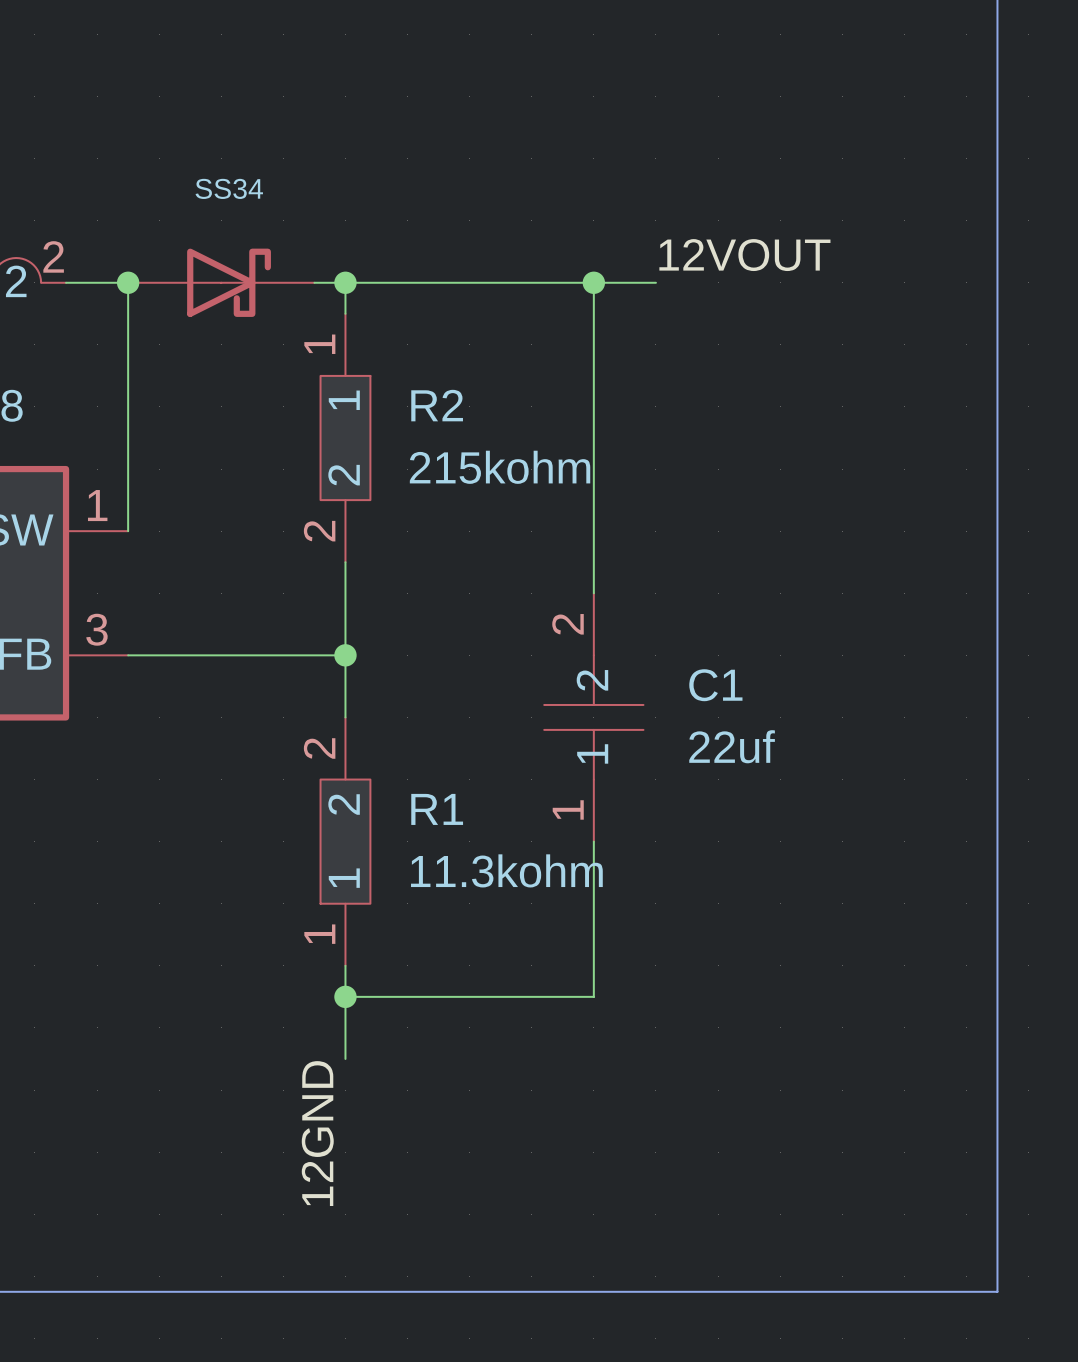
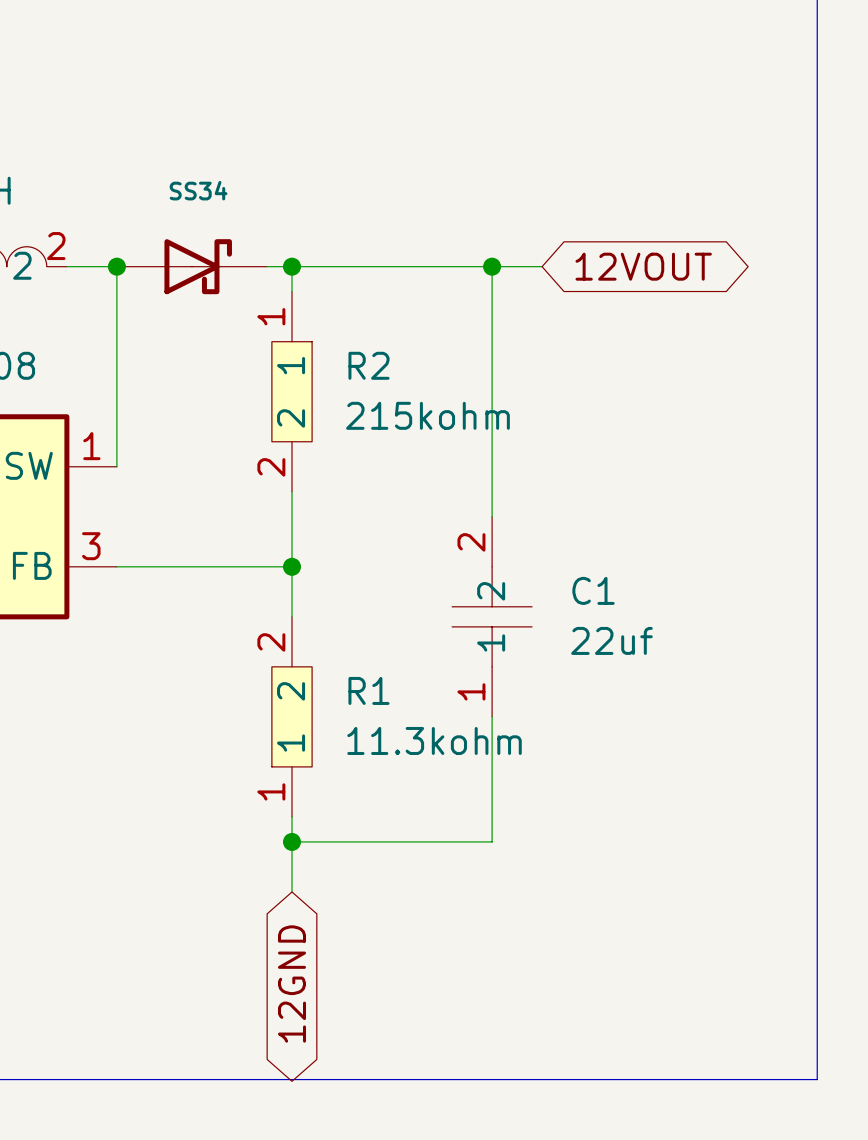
label: 12VOUT (744, 255) -> none
global label: none -> 12VOUT (643, 266)
label: 12GND (317, 1133) -> none
global label: none -> 12GND (291, 984)

